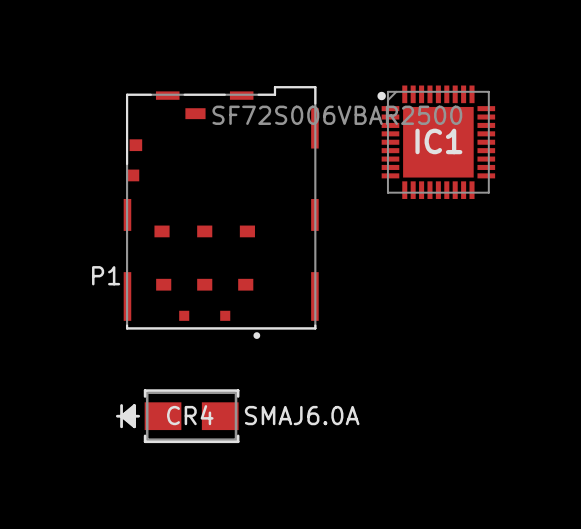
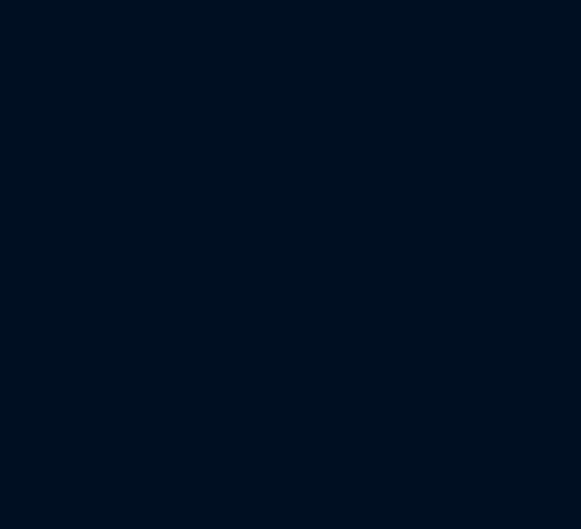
IC1: (436, 142) -> none
P1: SF72S006VBAR2500 (221, 212) -> none
CR4: SMAJ6.0A (177, 416) -> none

